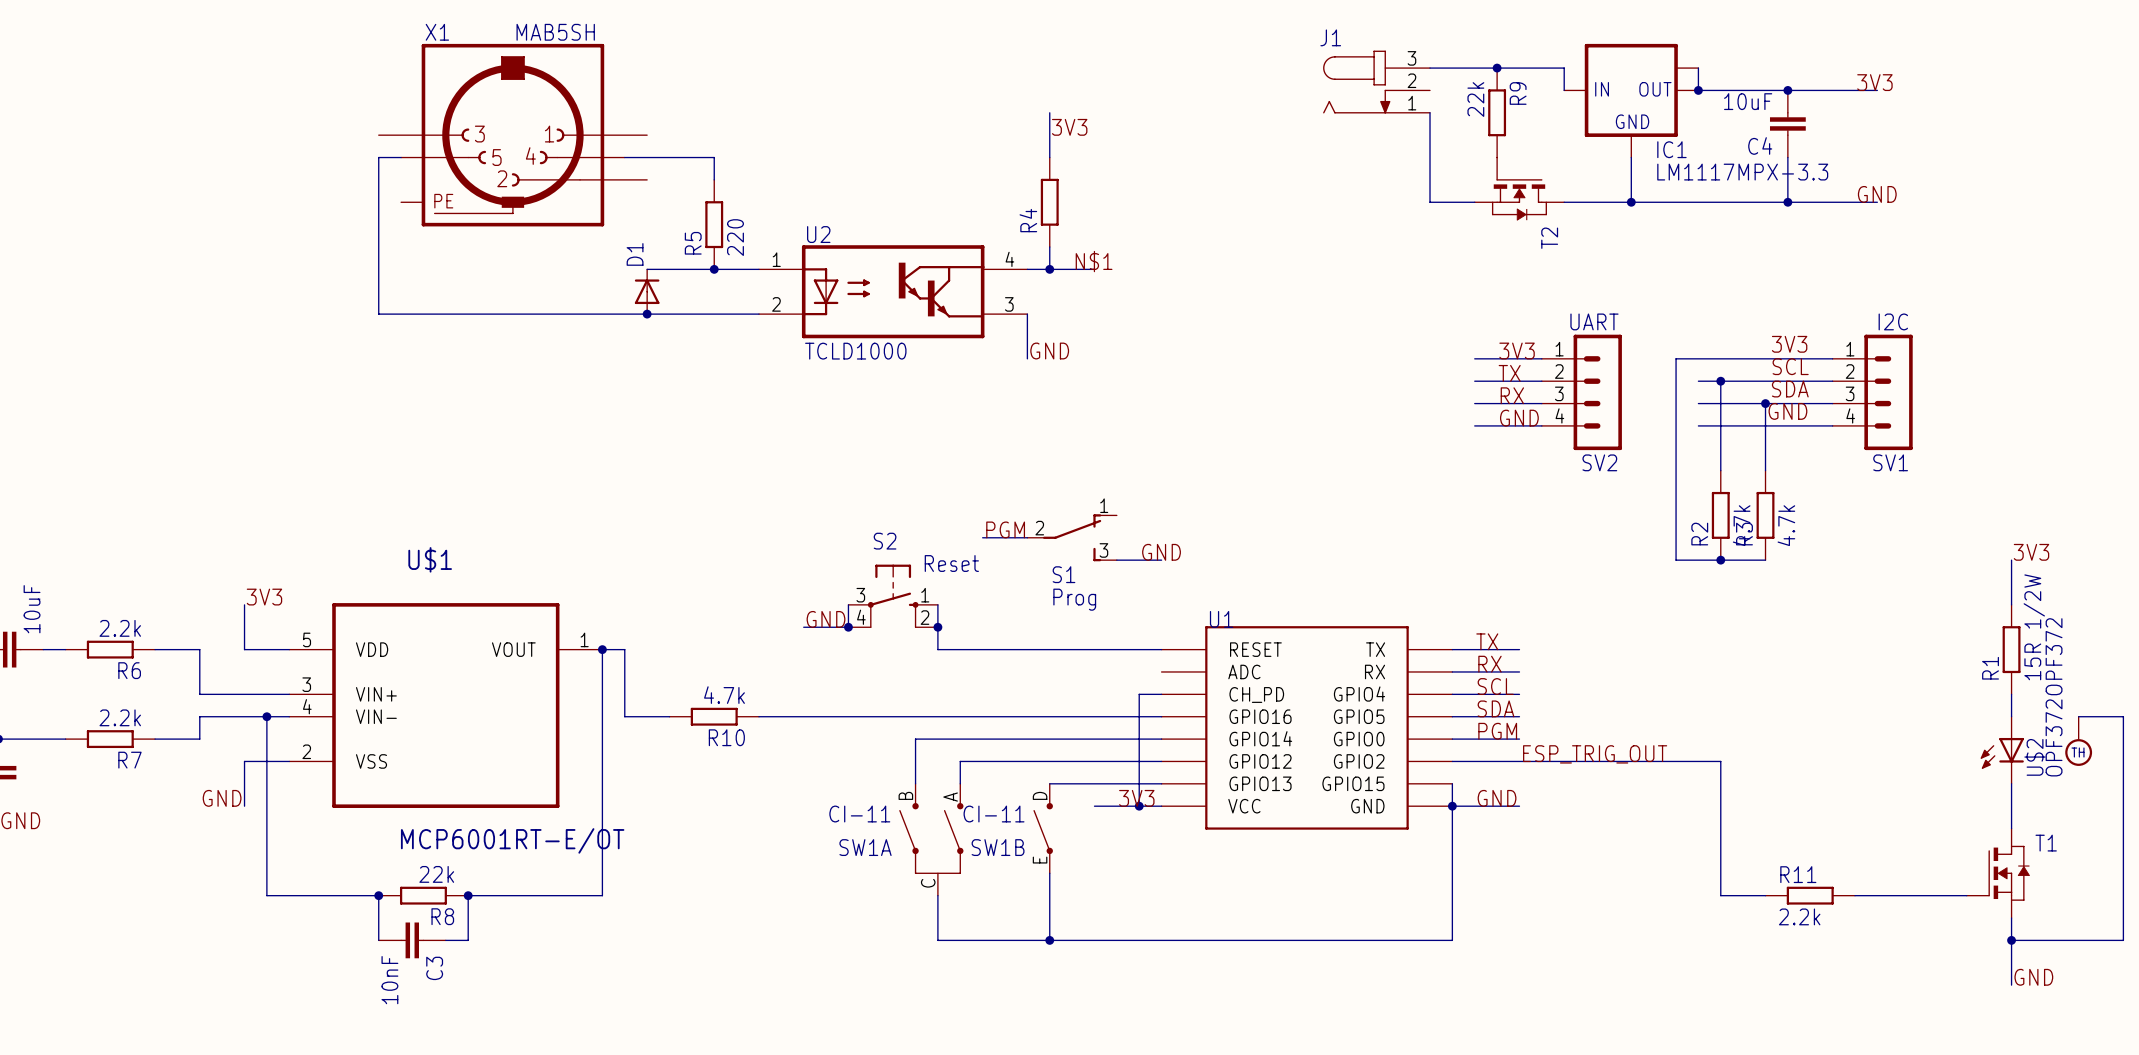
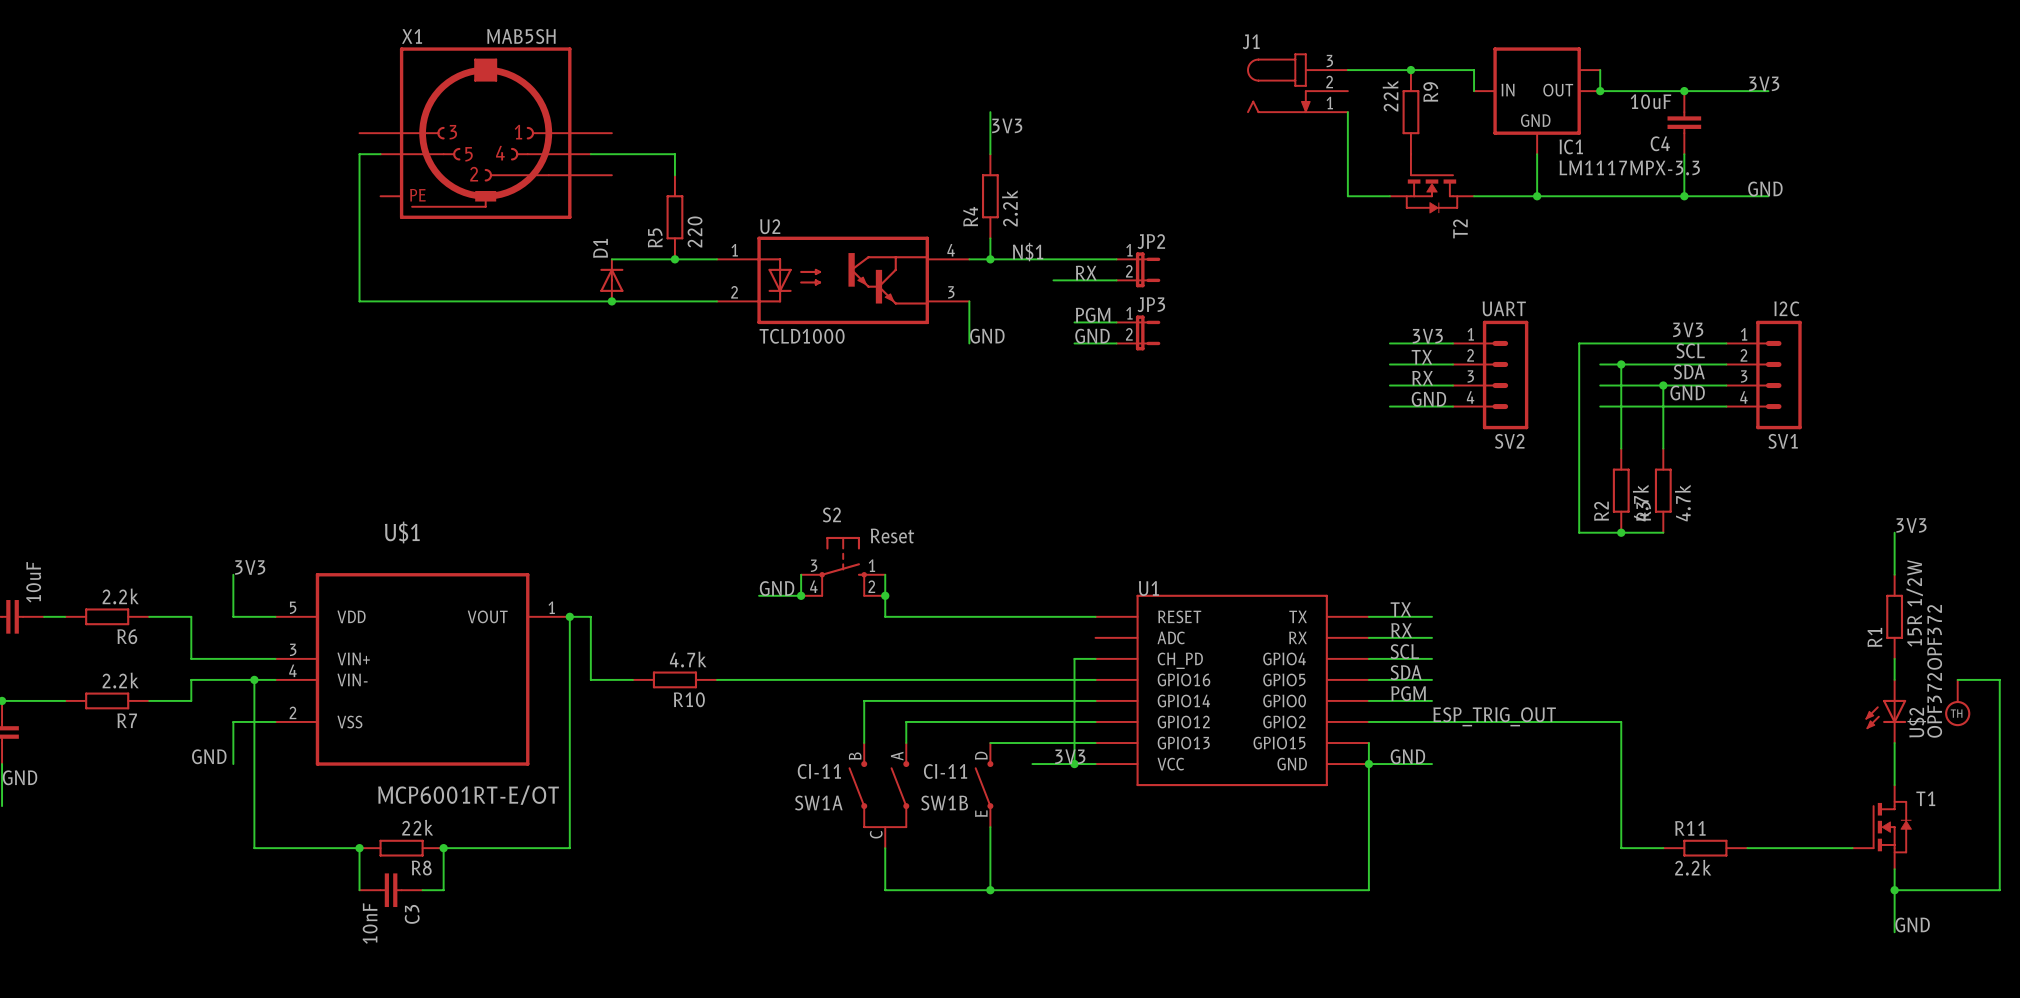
R4 value: none -> 2.2k (1009, 208)
wire: none -> (1032, 259) (1116, 259)
JP2: none -> (1138, 269)
label: none -> RX (1086, 273)
wire: none -> (1053, 280) (1116, 280)
label: none -> PGM (1093, 315)
wire: none -> (1074, 322) (1116, 322)
JP3: none -> (1138, 332)
label: PGM (1005, 529) -> none
wire: (982, 537) (1027, 537) -> none
S1: Prog (1072, 537) -> none
label position: GND (1161, 552) -> GND (1092, 336)
wire: (1116, 560) (1161, 560) -> (1074, 343) (1116, 343)

